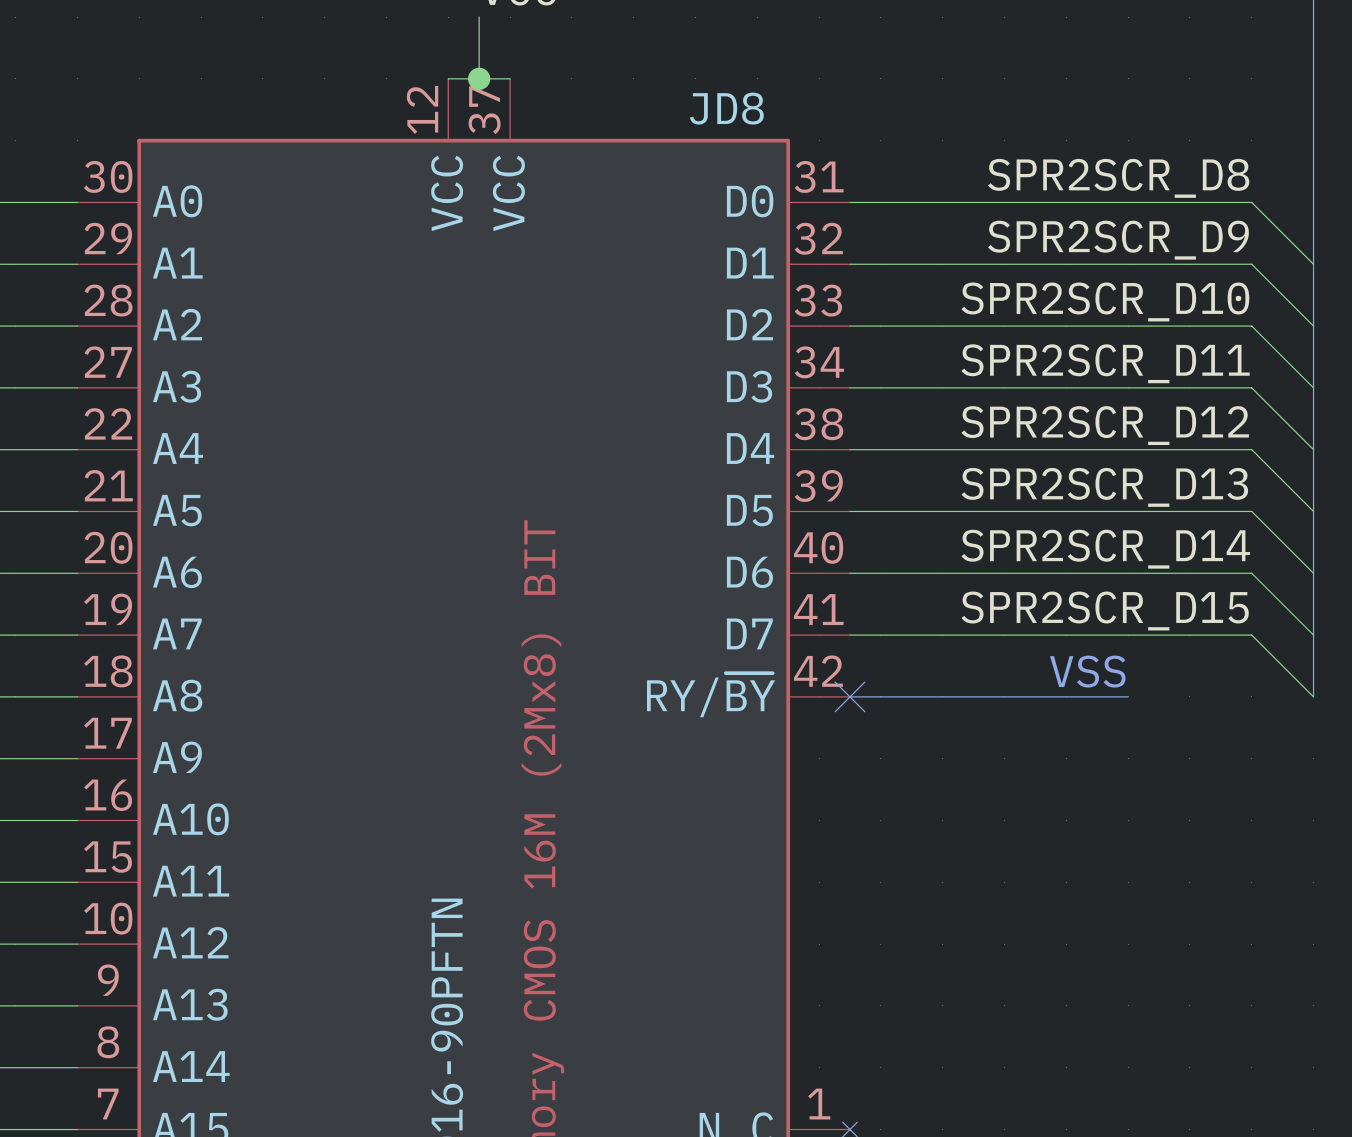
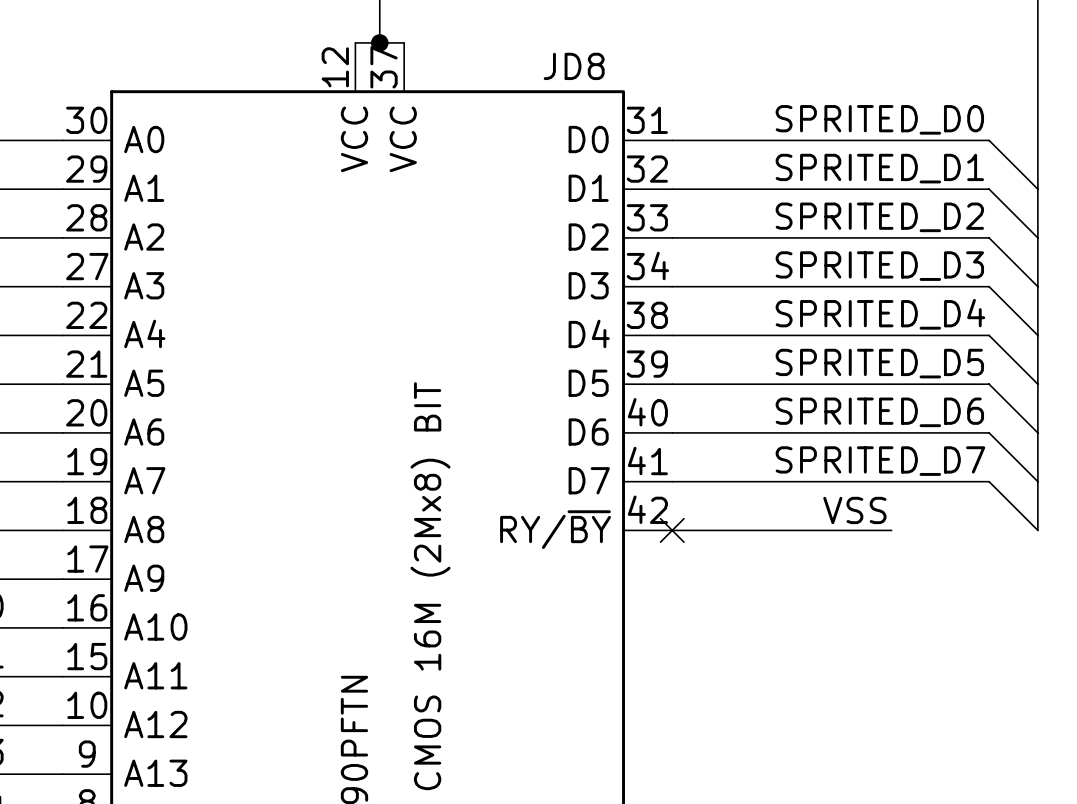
label: SPR2SCR_D8 (1118, 178) -> SPRITED_D0 (879, 119)
label: SPR2SCR_D9 (1118, 240) -> SPRITED_D1 (879, 168)
label: SPR2SCR_D10 (1105, 301) -> SPRITED_D2 (879, 217)
label: SPR2SCR_D11 (1105, 363) -> SPRITED_D3 (879, 266)
label: SPR2SCR_D12 (1105, 425) -> SPRITED_D4 (880, 314)
label: SPR2SCR_D13 (1104, 487) -> SPRITED_D5 (879, 363)
label: SPR2SCR_D14 (1105, 549) -> SPRITED_D6 (879, 412)
label: SPR2SCR_D15 (1105, 610) -> SPRITED_D7 (880, 461)

